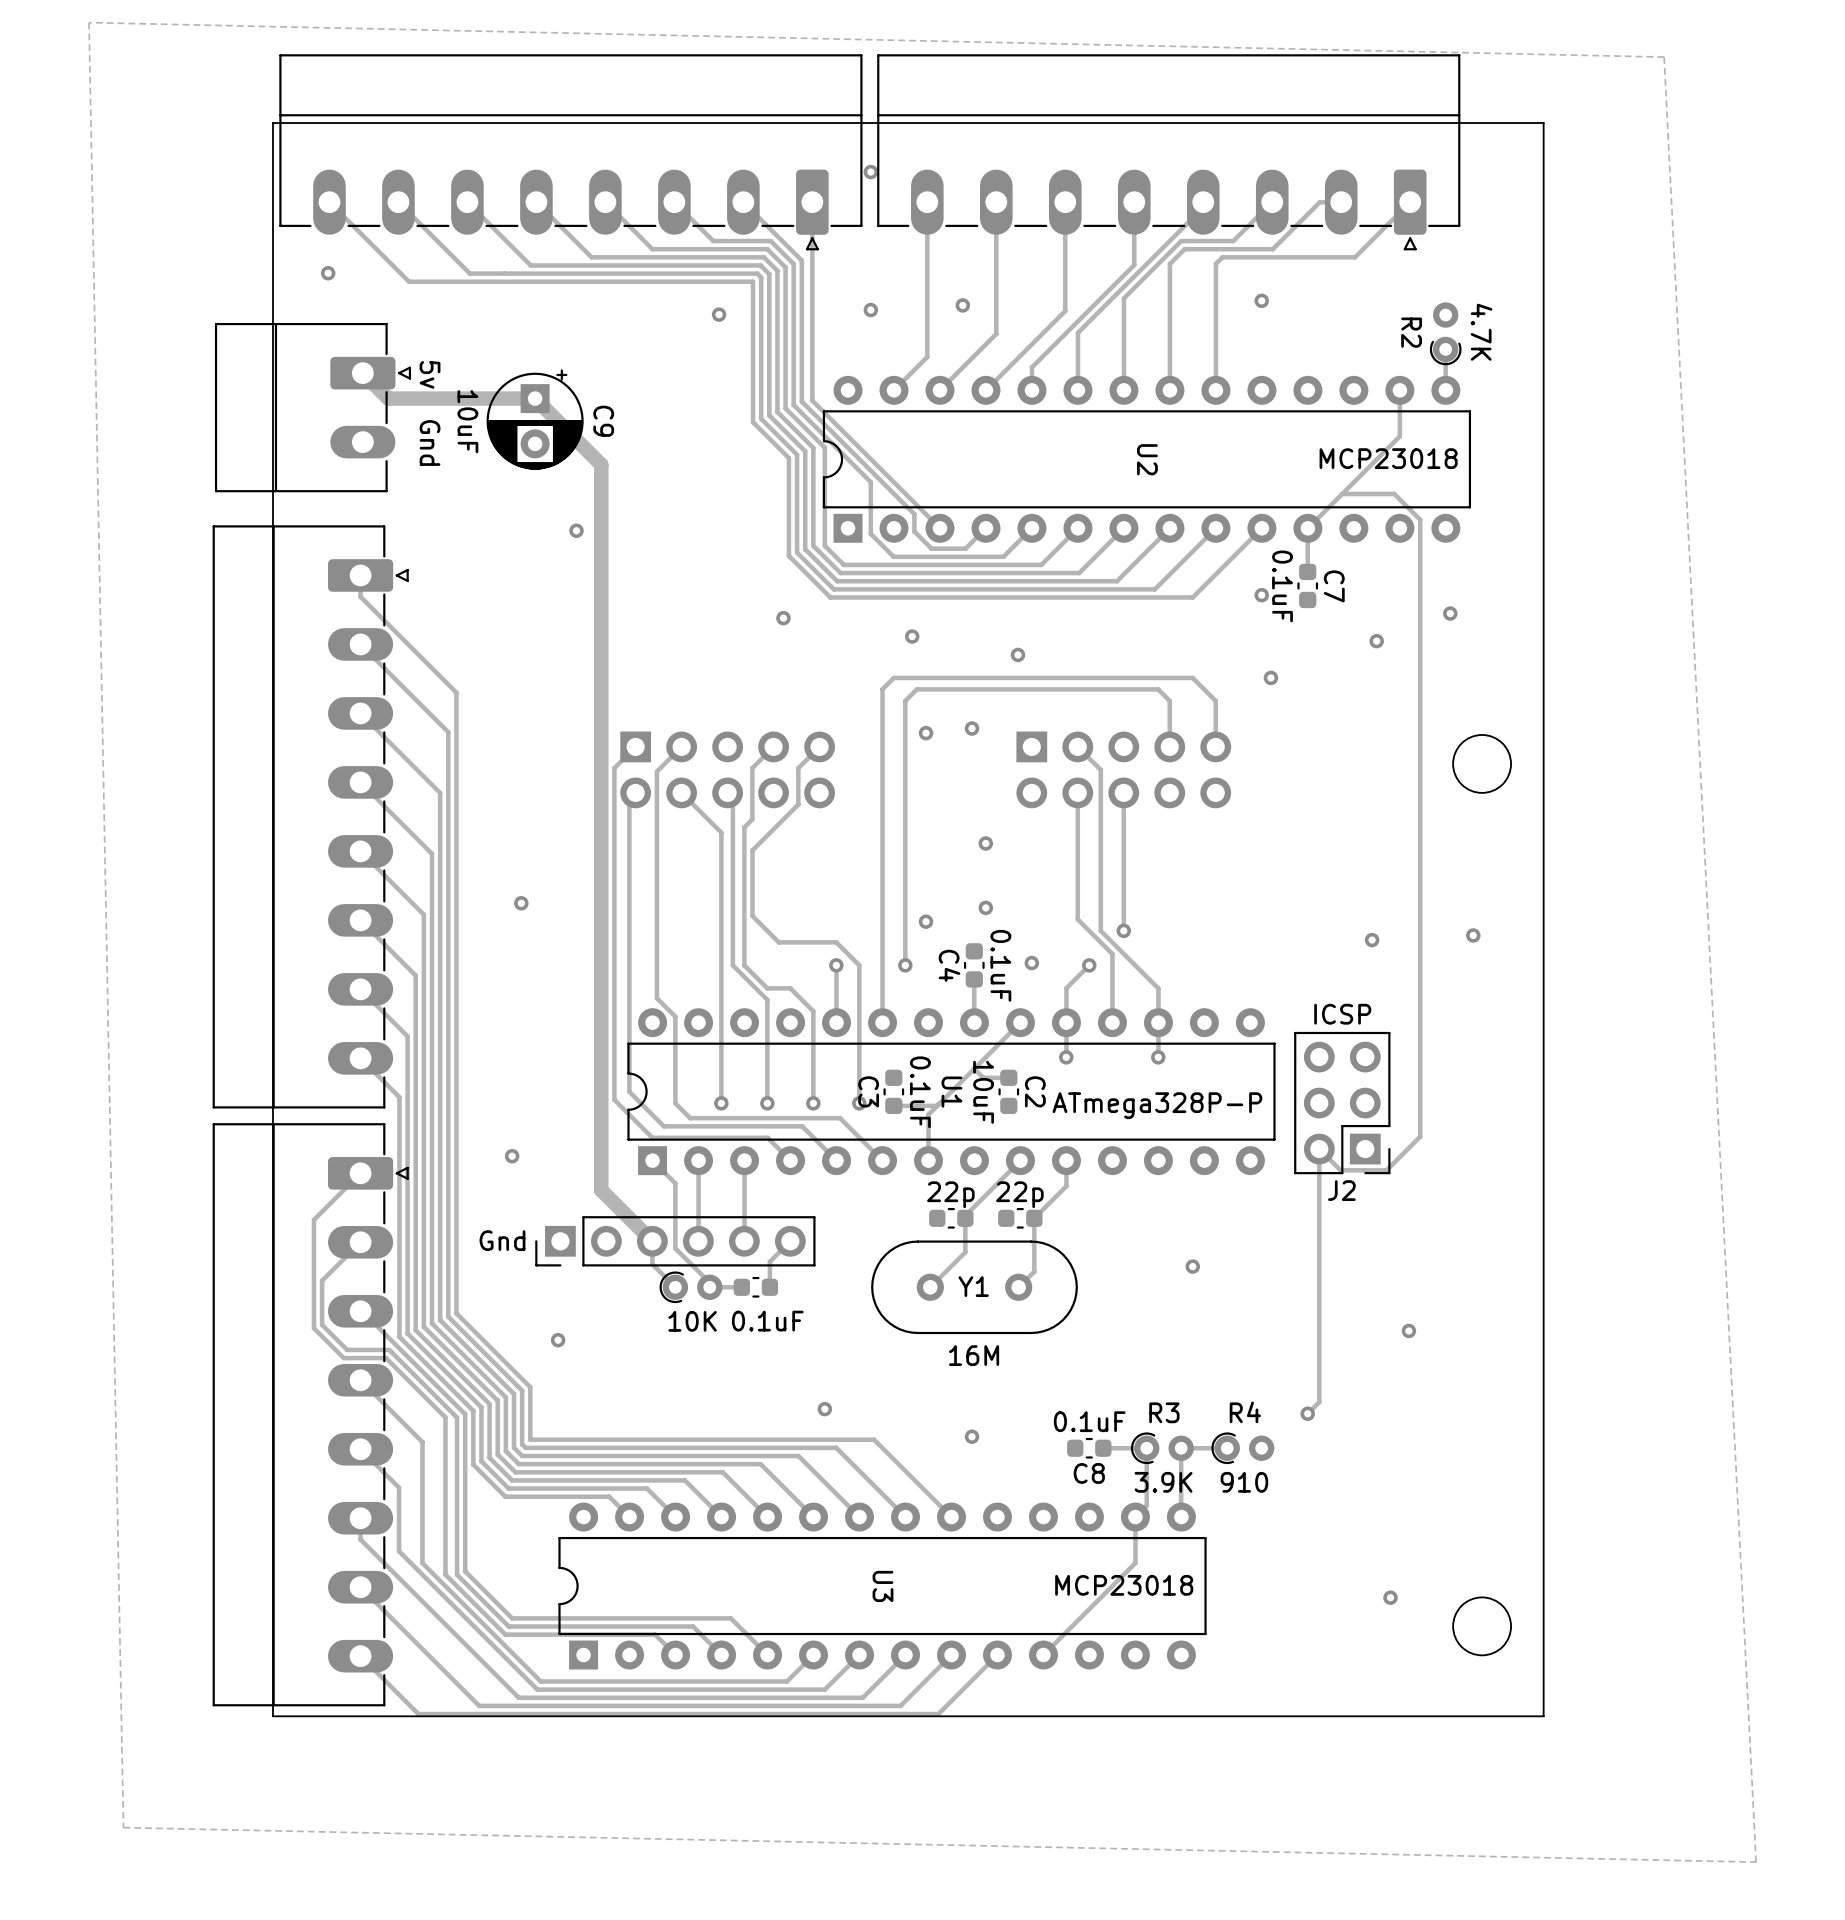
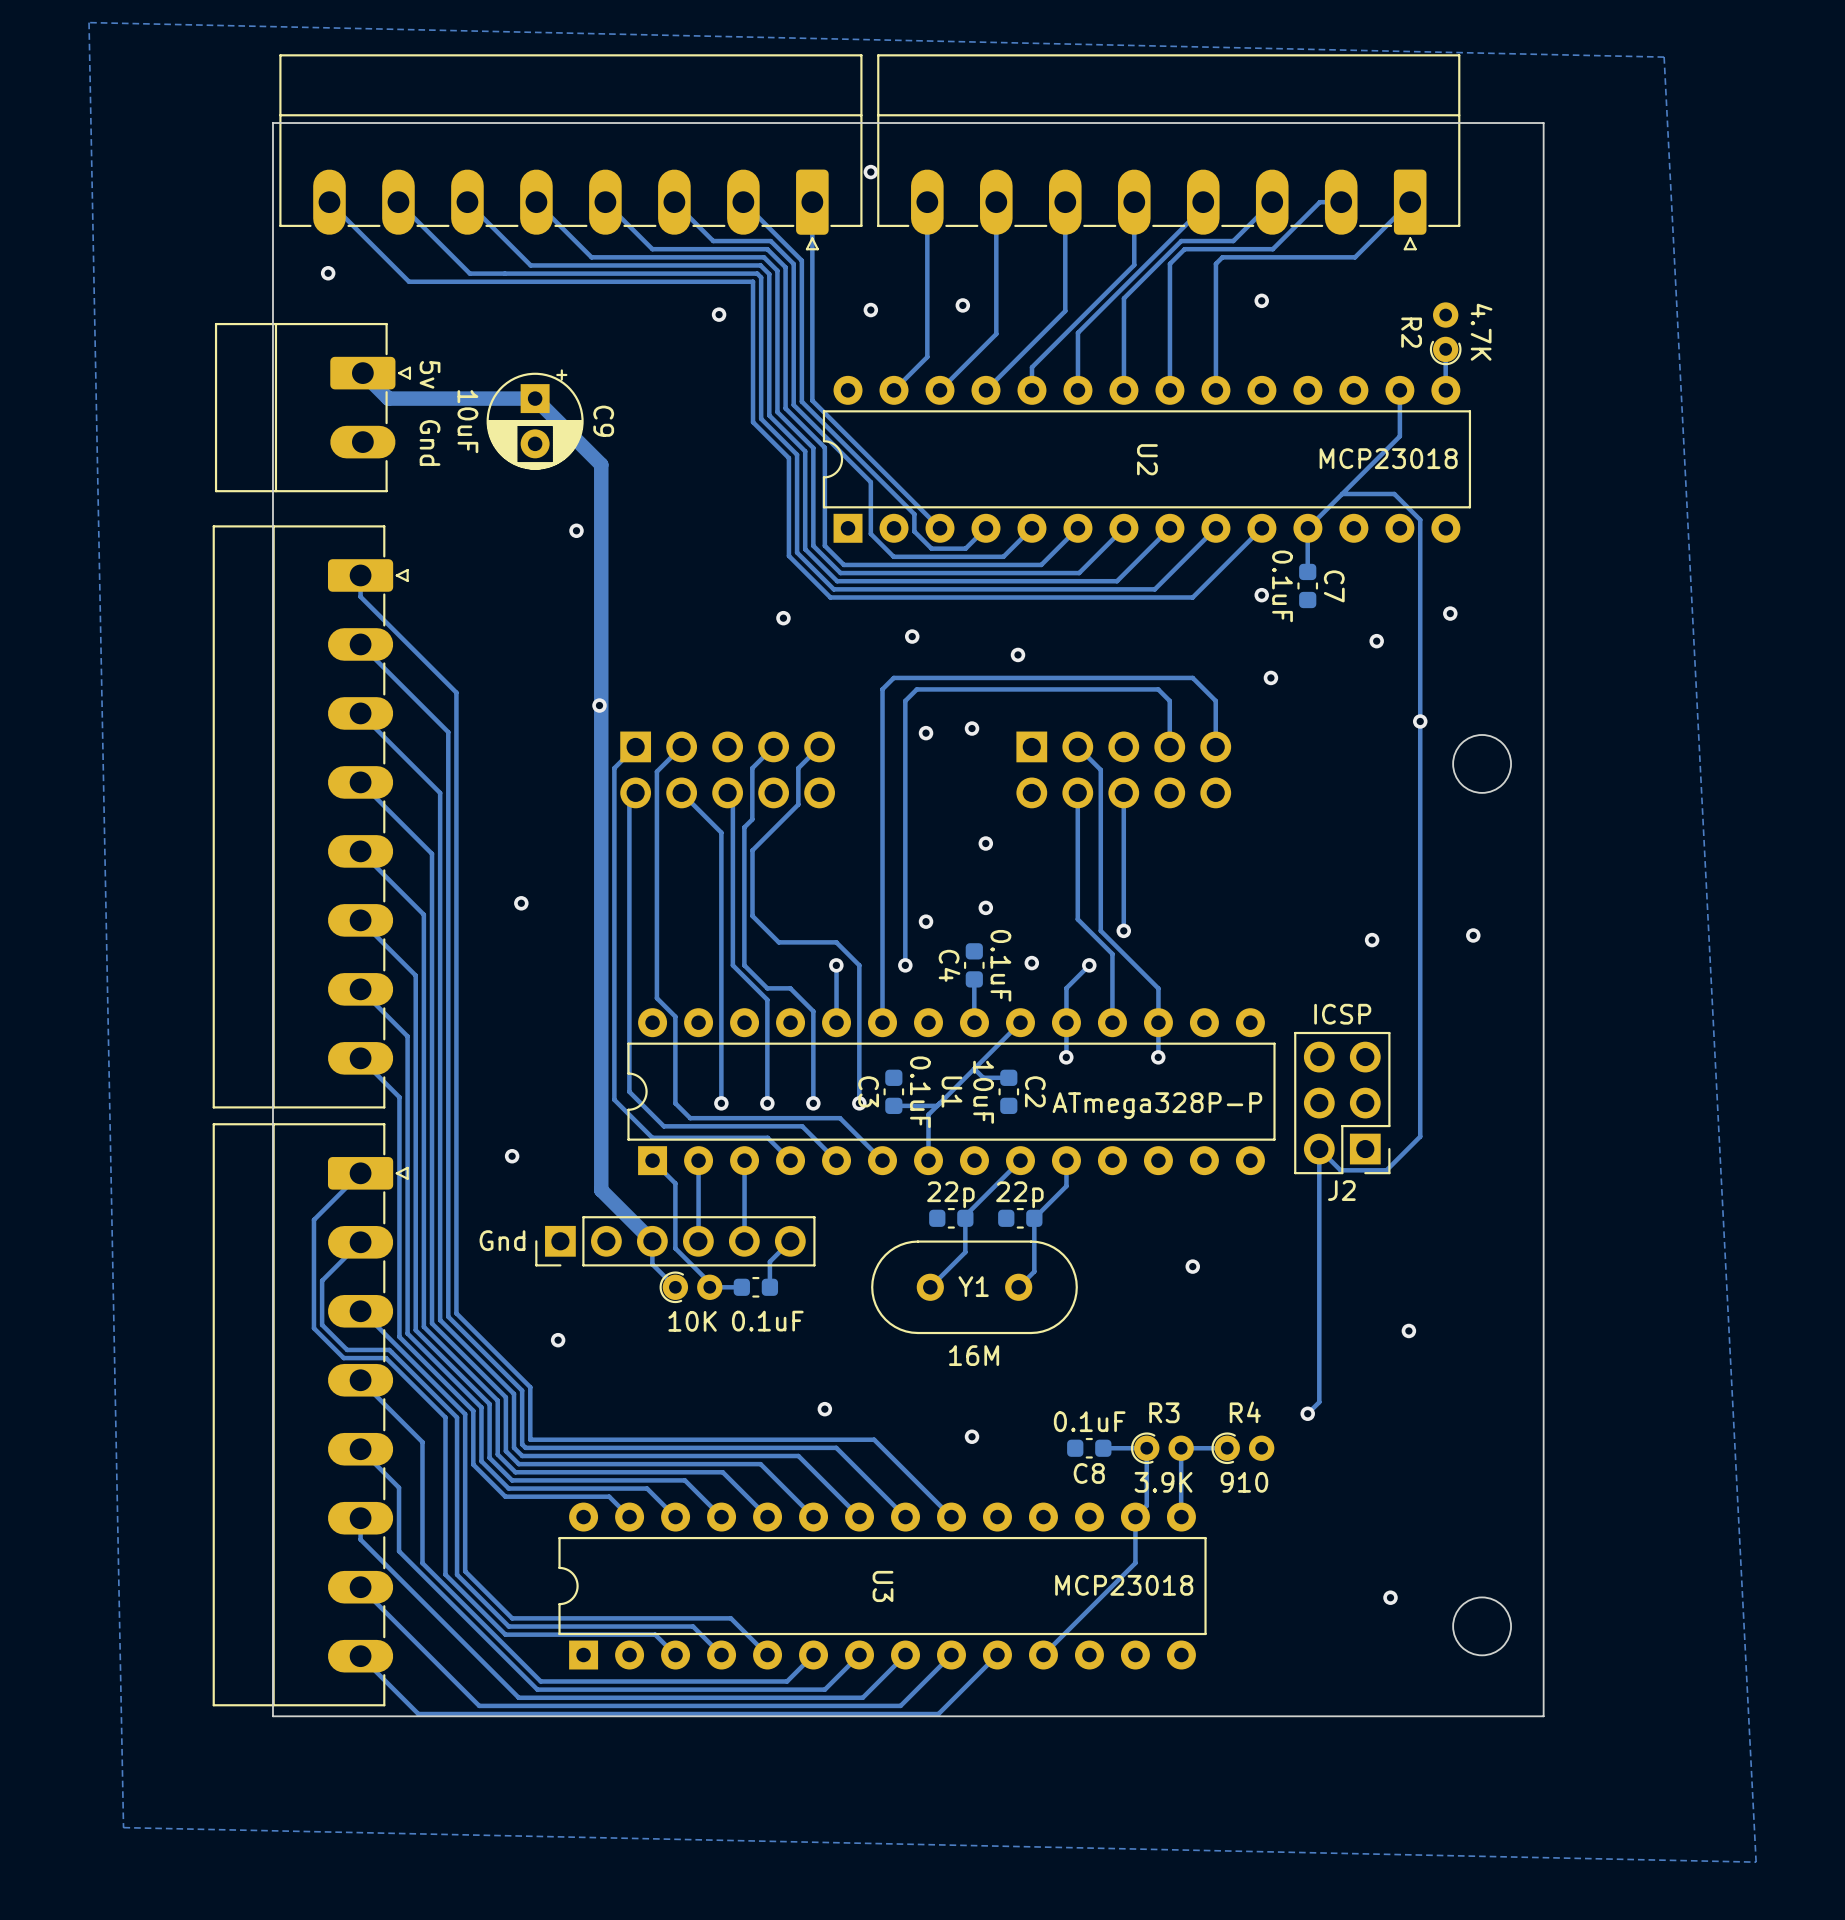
via: none -> (599, 705)
via: none -> (1420, 721)

